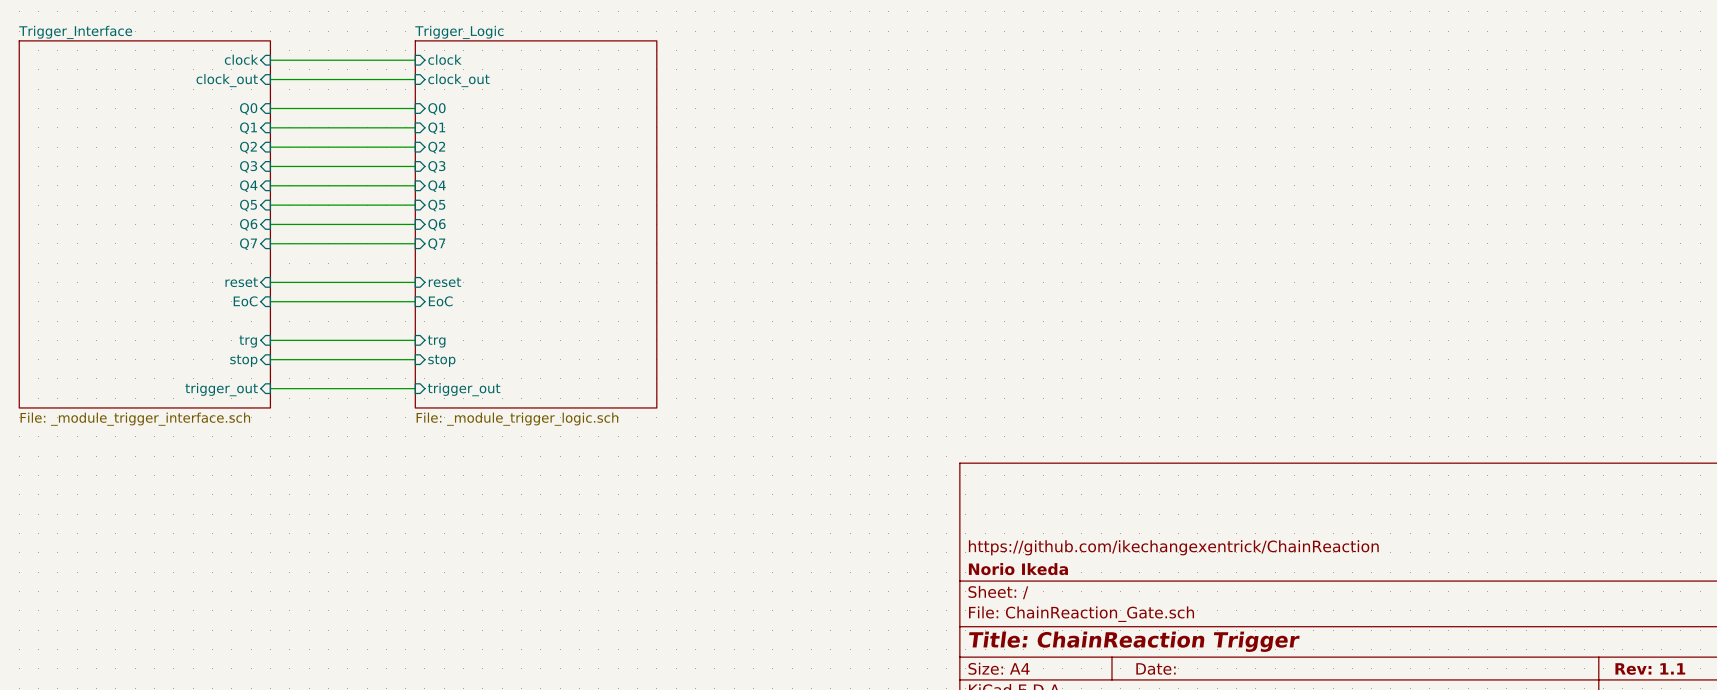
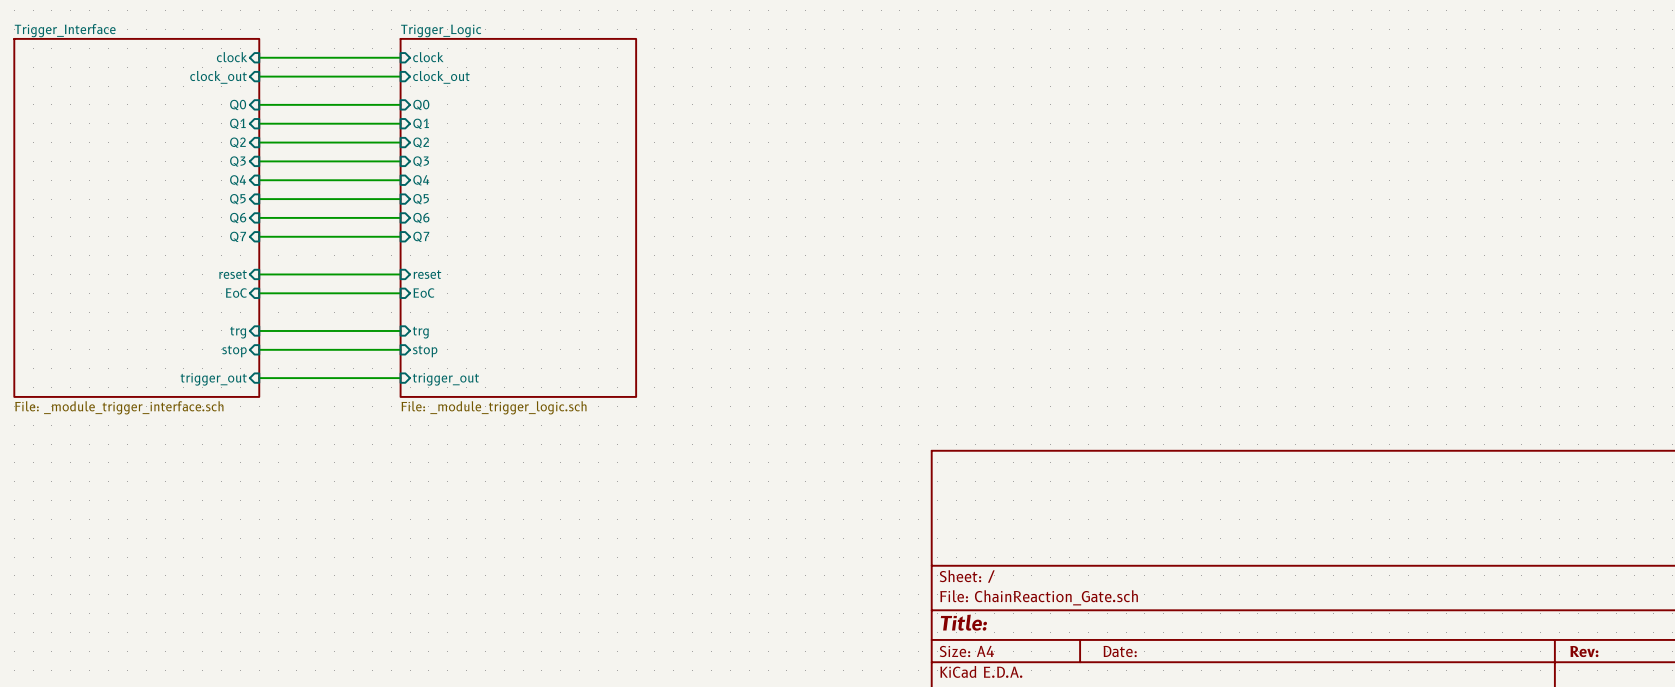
title block: https://github.com/ikechangexentrick/ChainReaction (1173, 547) -> none
title block: Norio Ikeda (1018, 569) -> none
title block: Title: ChainReaction Trigger (1134, 641) -> Title: (963, 622)
title block: Rev: 1.1 (1650, 668) -> Rev: (1584, 651)

